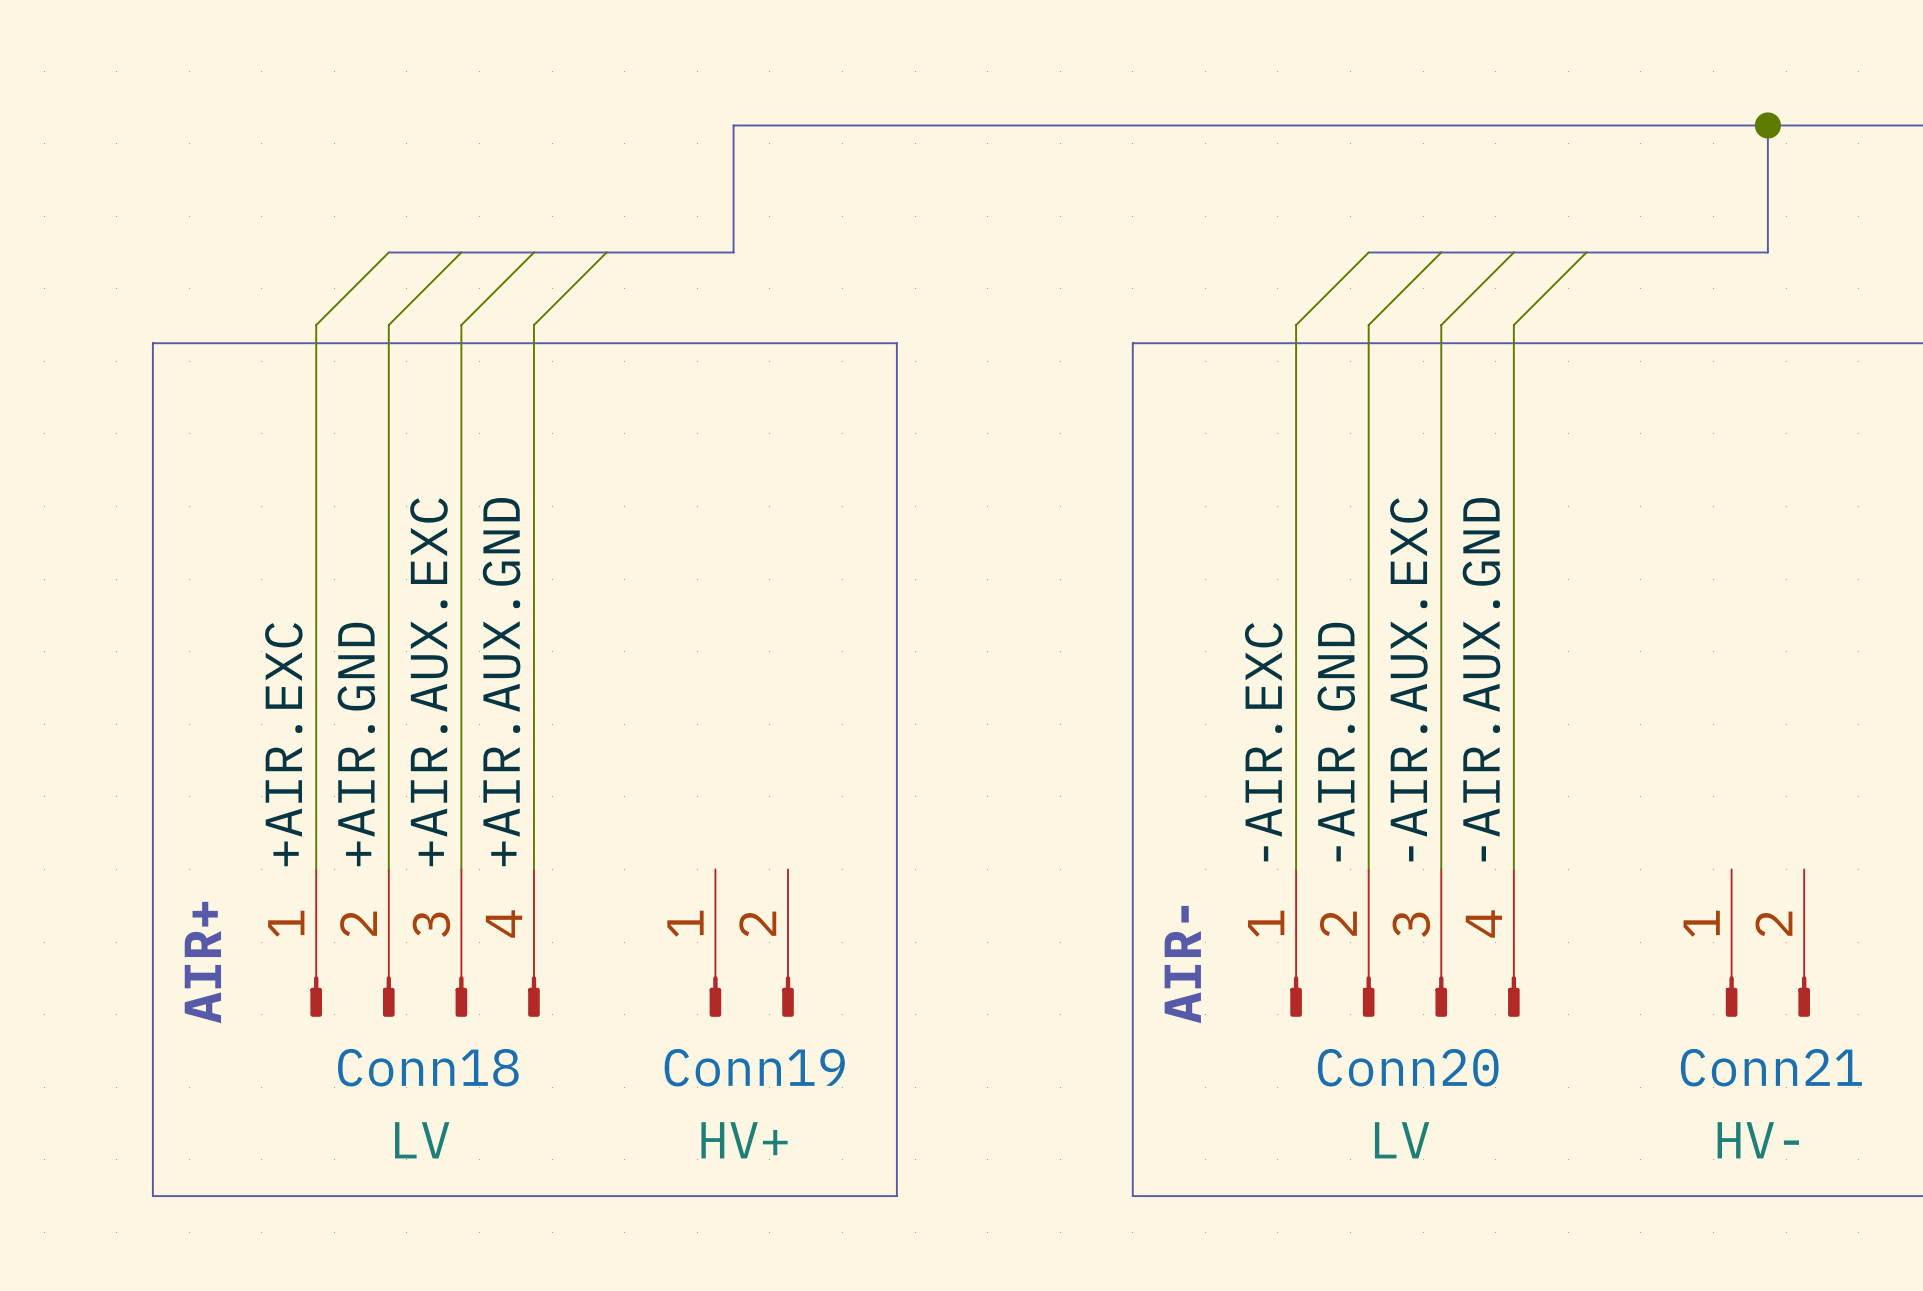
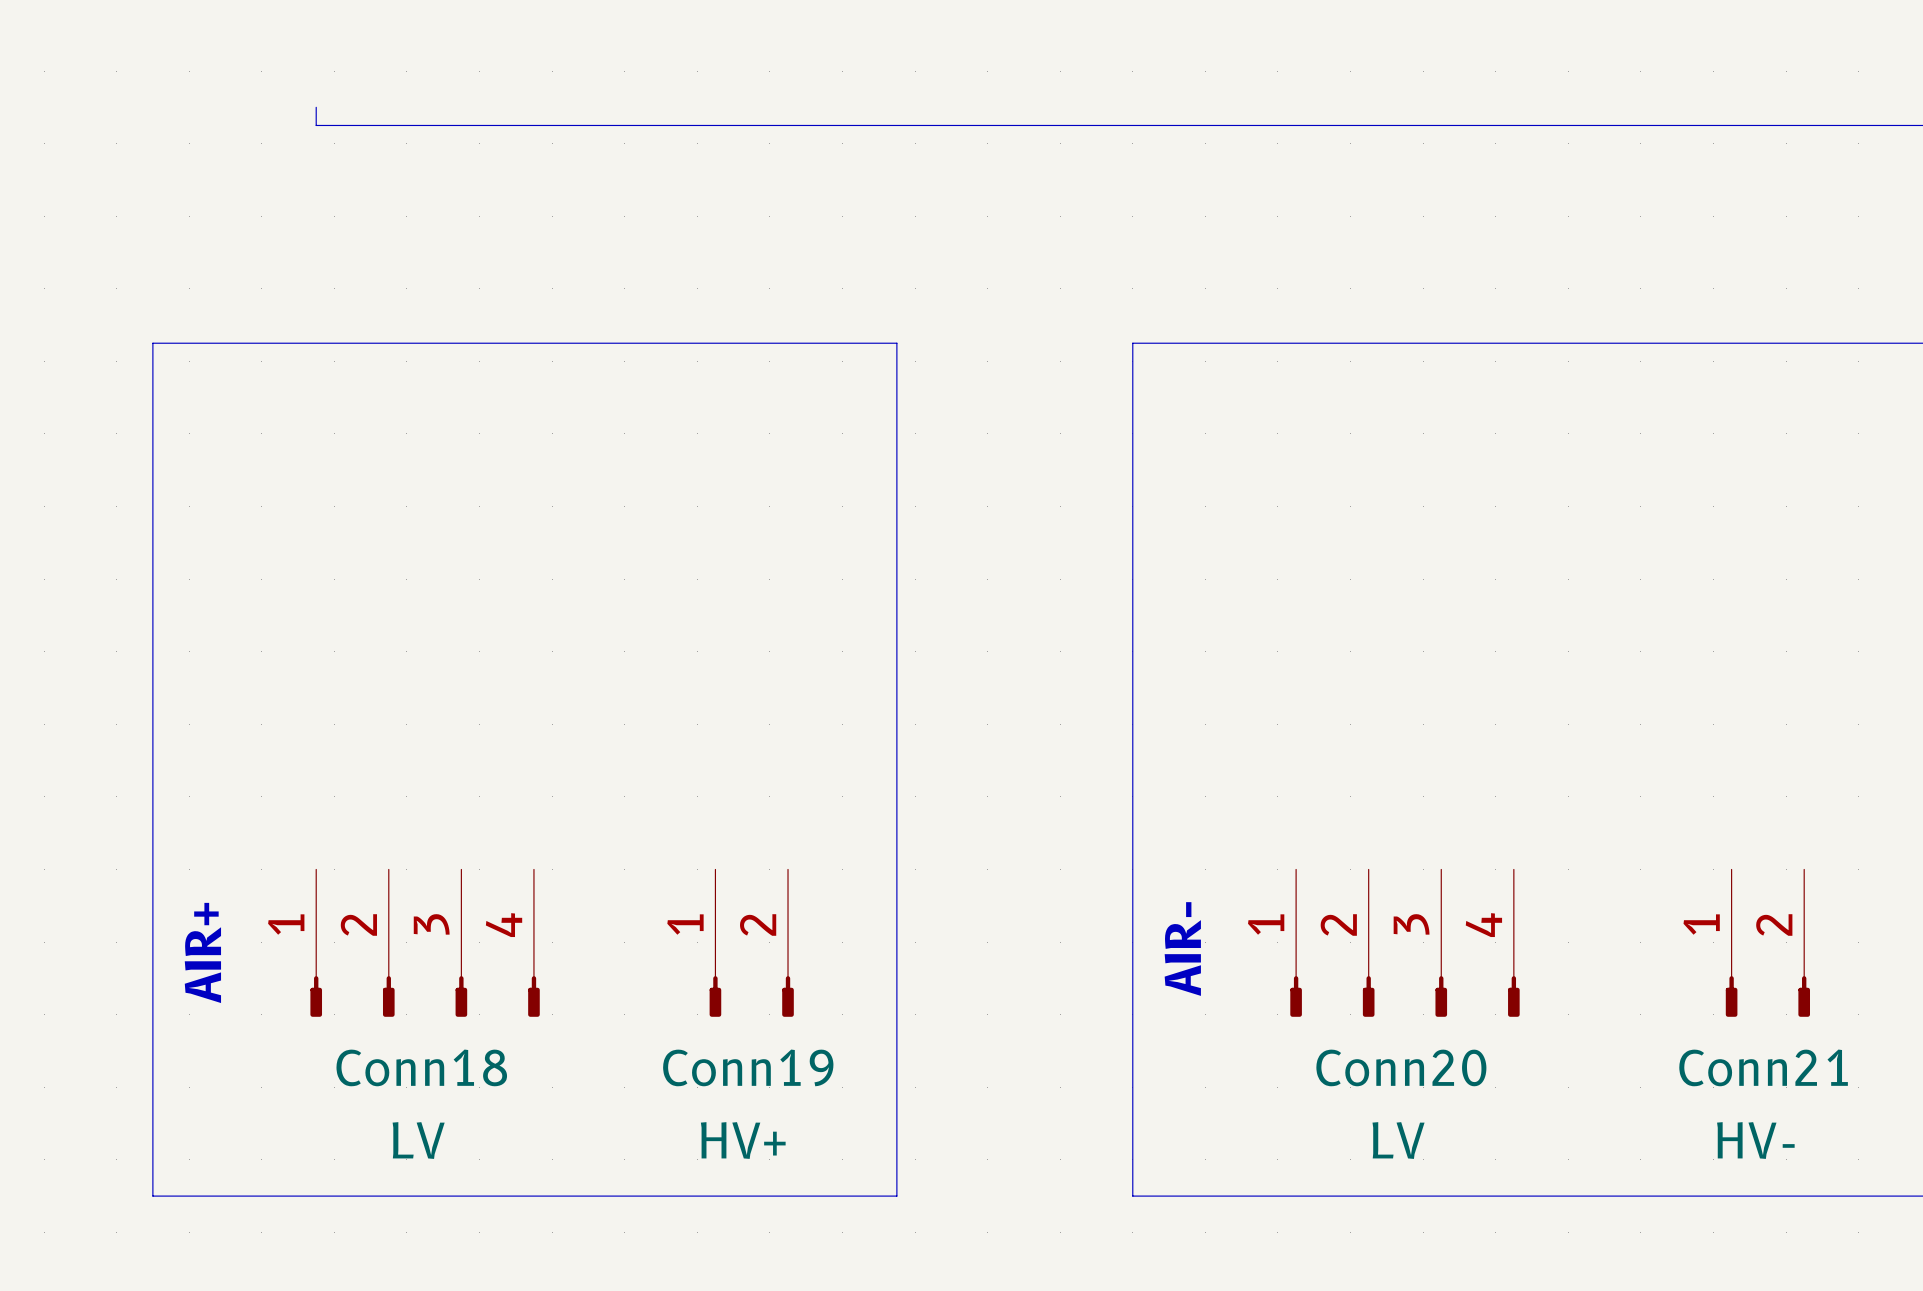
bus: (733, 125) (733, 252) (388, 252) -> (733, 125) (316, 125) (316, 107)
bus: (1767, 125) (1767, 252) (1368, 252) -> none
junction: (1767, 125) -> none
wire: (388, 252) (316, 325) -> none
wire: (461, 252) (388, 325) (388, 869) -> none
wire: (533, 252) (461, 325) (461, 869) -> none
wire: (606, 252) (533, 325) (533, 869) -> none
wire: (1368, 252) (1296, 325) -> none
wire: (1441, 252) (1368, 325) (1368, 869) -> none
wire: (1513, 252) (1441, 325) -> none
wire: (1586, 252) (1513, 325) (1513, 869) -> none
wire: (316, 325) (316, 869) -> none
wire: (1296, 325) (1296, 869) -> none
wire: (1441, 325) (1441, 869) -> none
label: -AIR.AUX.EXC (1408, 679) -> none
label: -AIR.AUX.GND (1481, 679) -> none
label: +AIR.AUX.EXC (428, 682) -> none
label: +AIR.AUX.GND (501, 682) -> none
label: -AIR.EXC (1263, 742) -> none
label: -AIR.GND (1336, 742) -> none
label: +AIR.EXC (283, 744) -> none
label: +AIR.GND (356, 744) -> none

